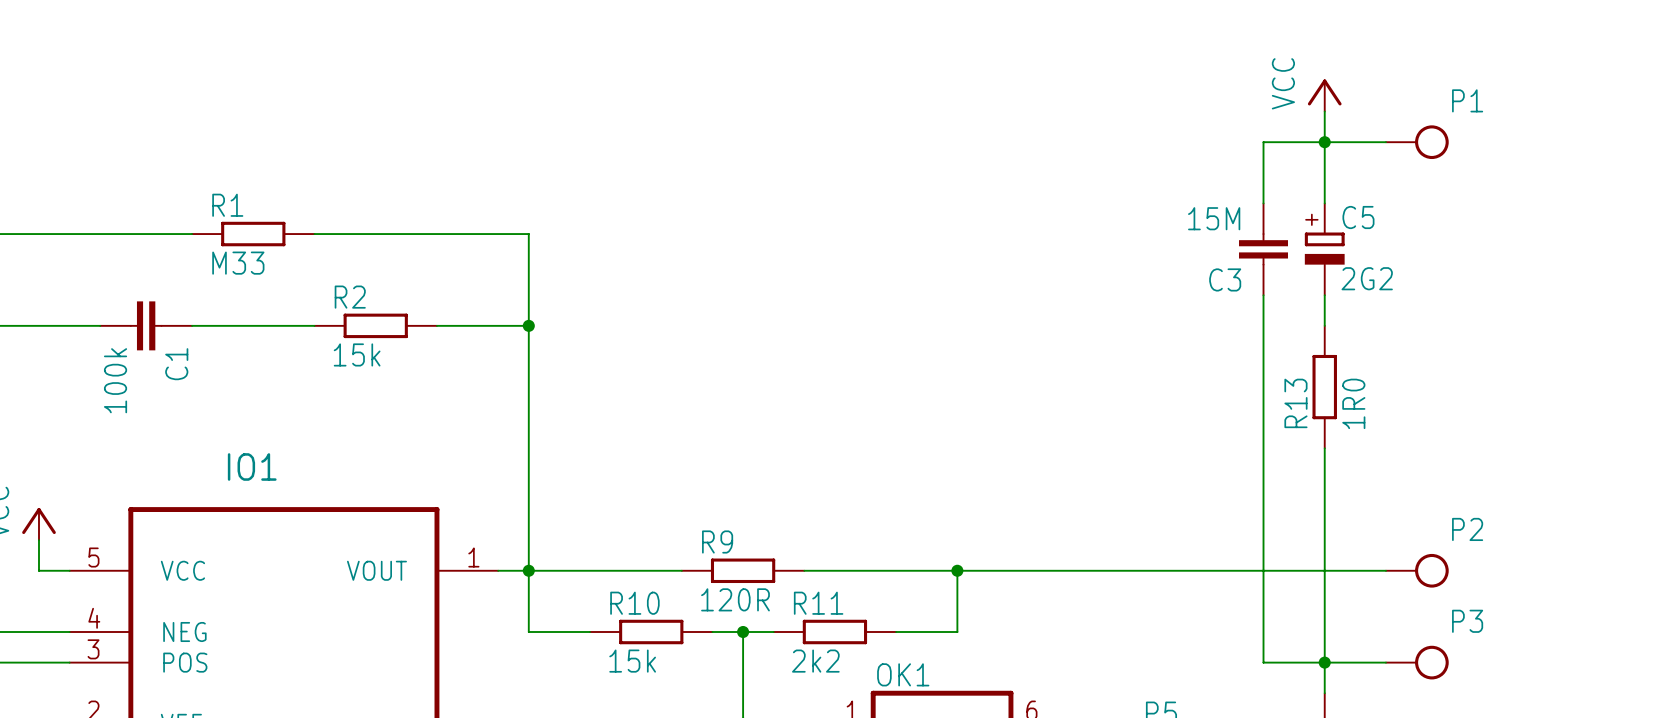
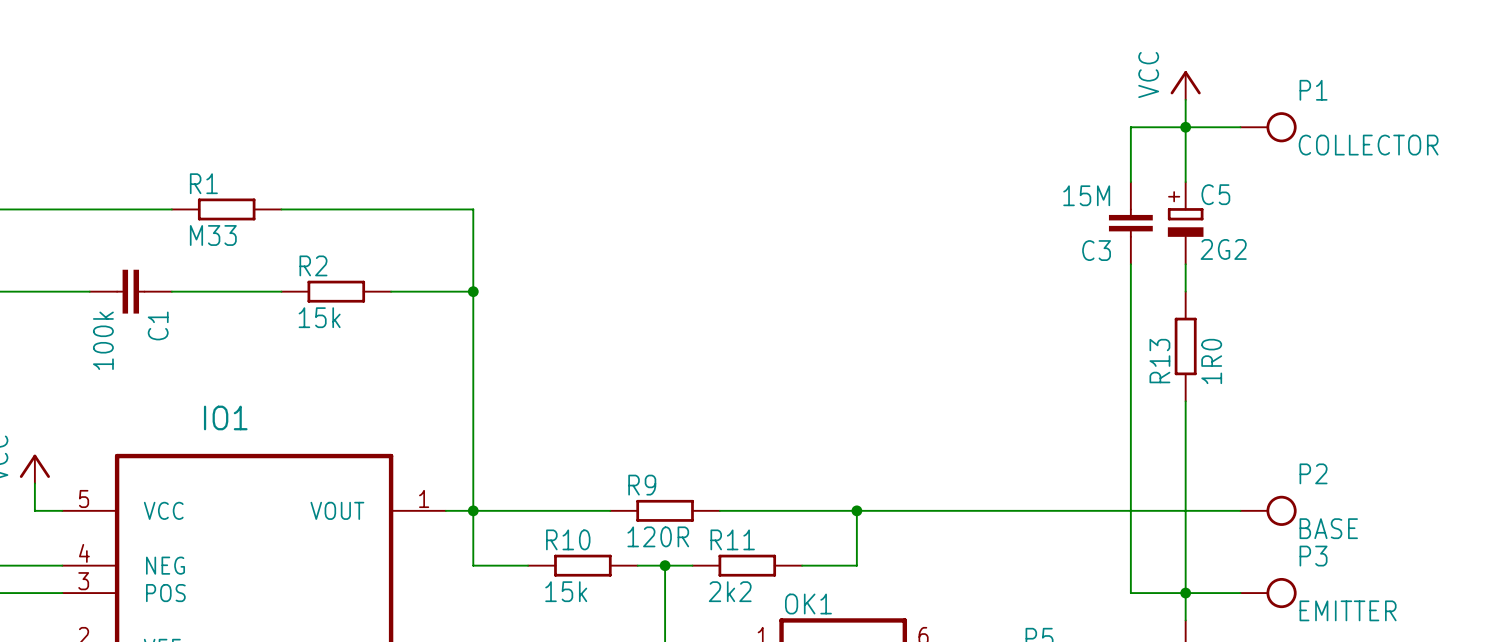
P1 value: none -> COLLECTOR (1368, 145)
P2 value: none -> BASE (1328, 528)
P3 value: none -> EMITTER (1348, 610)

